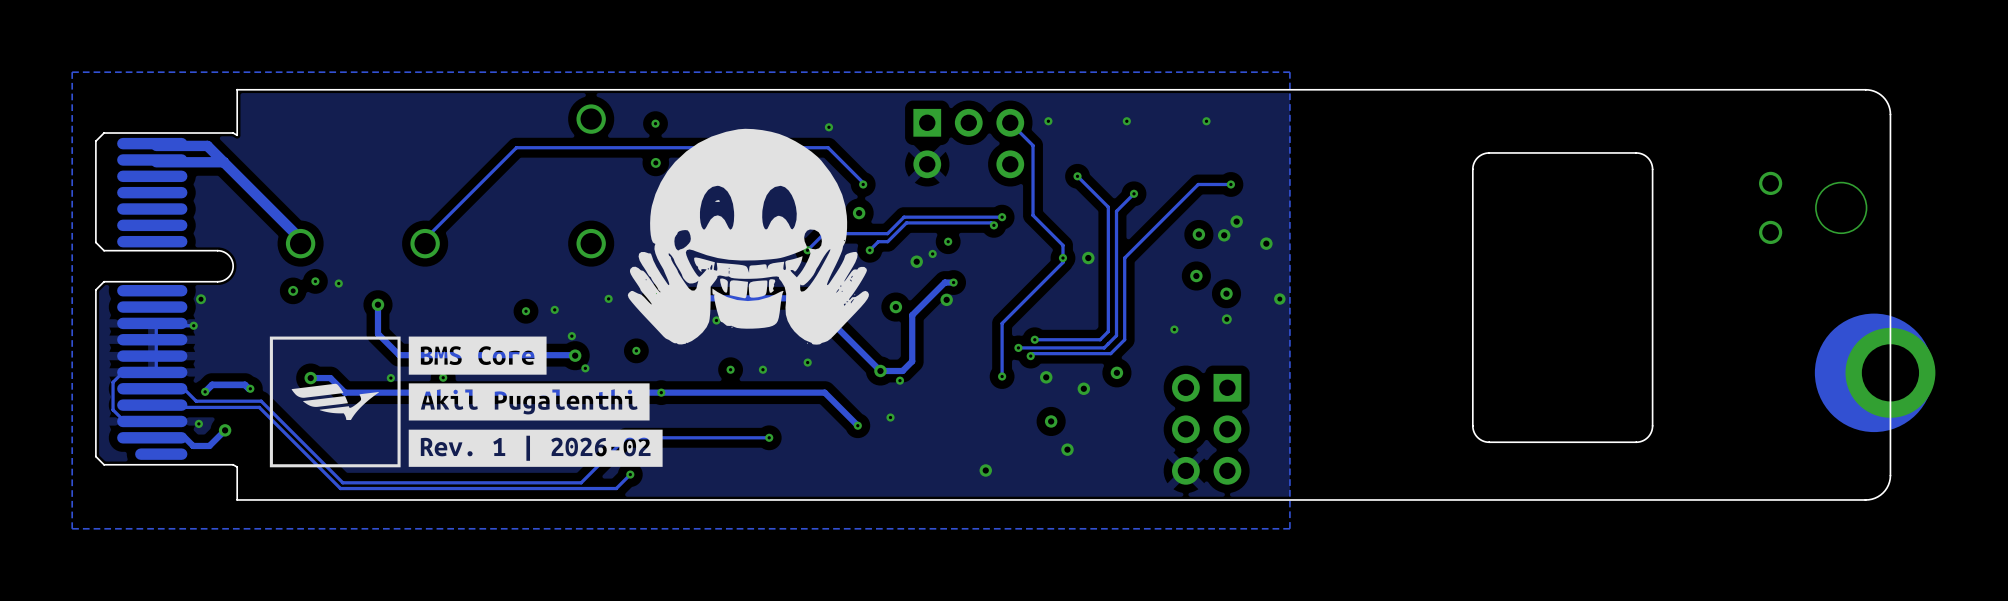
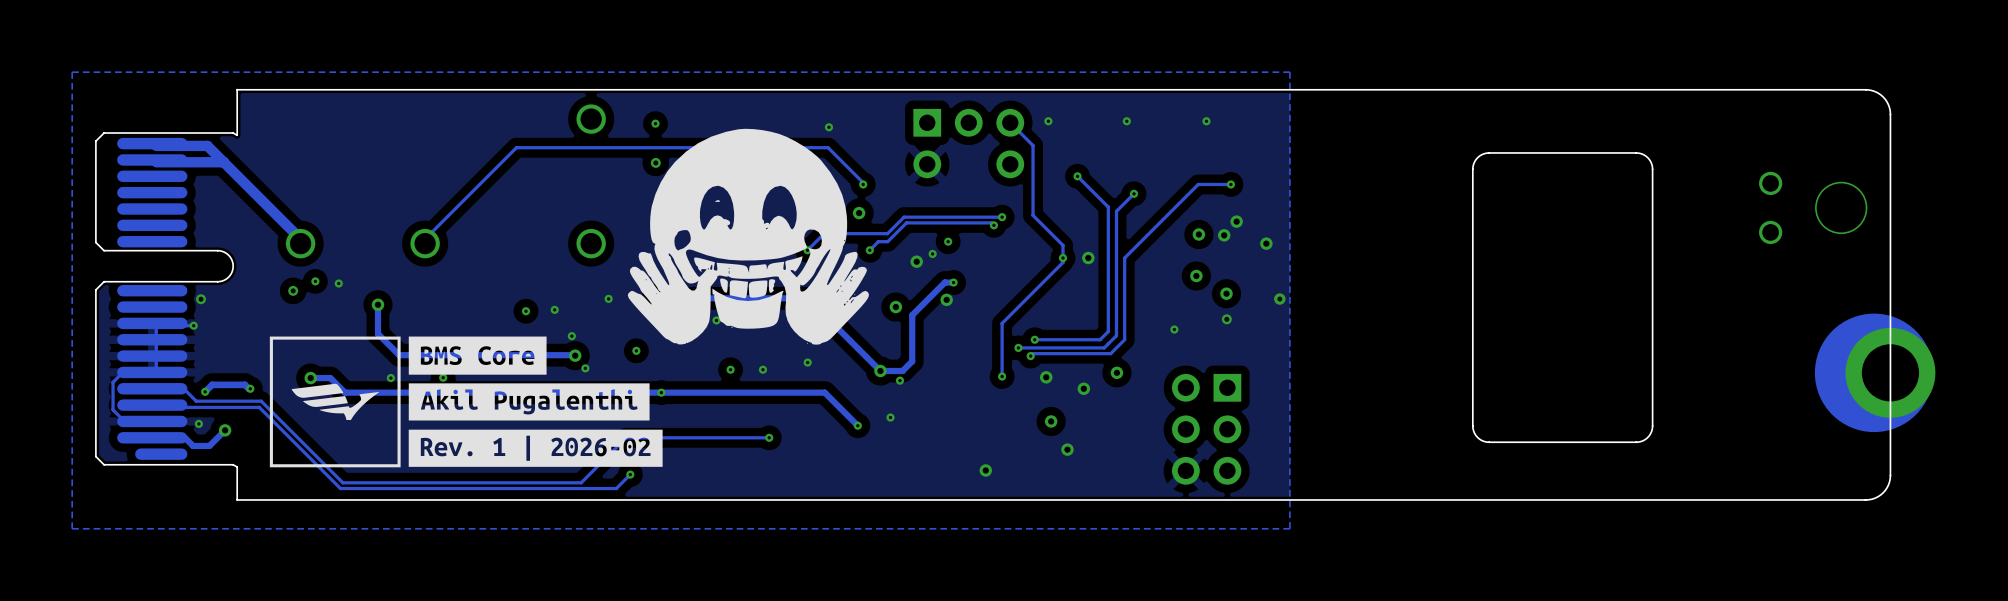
drawing: [627, 128, 869, 345] -> none
part: none -> (748, 236)

